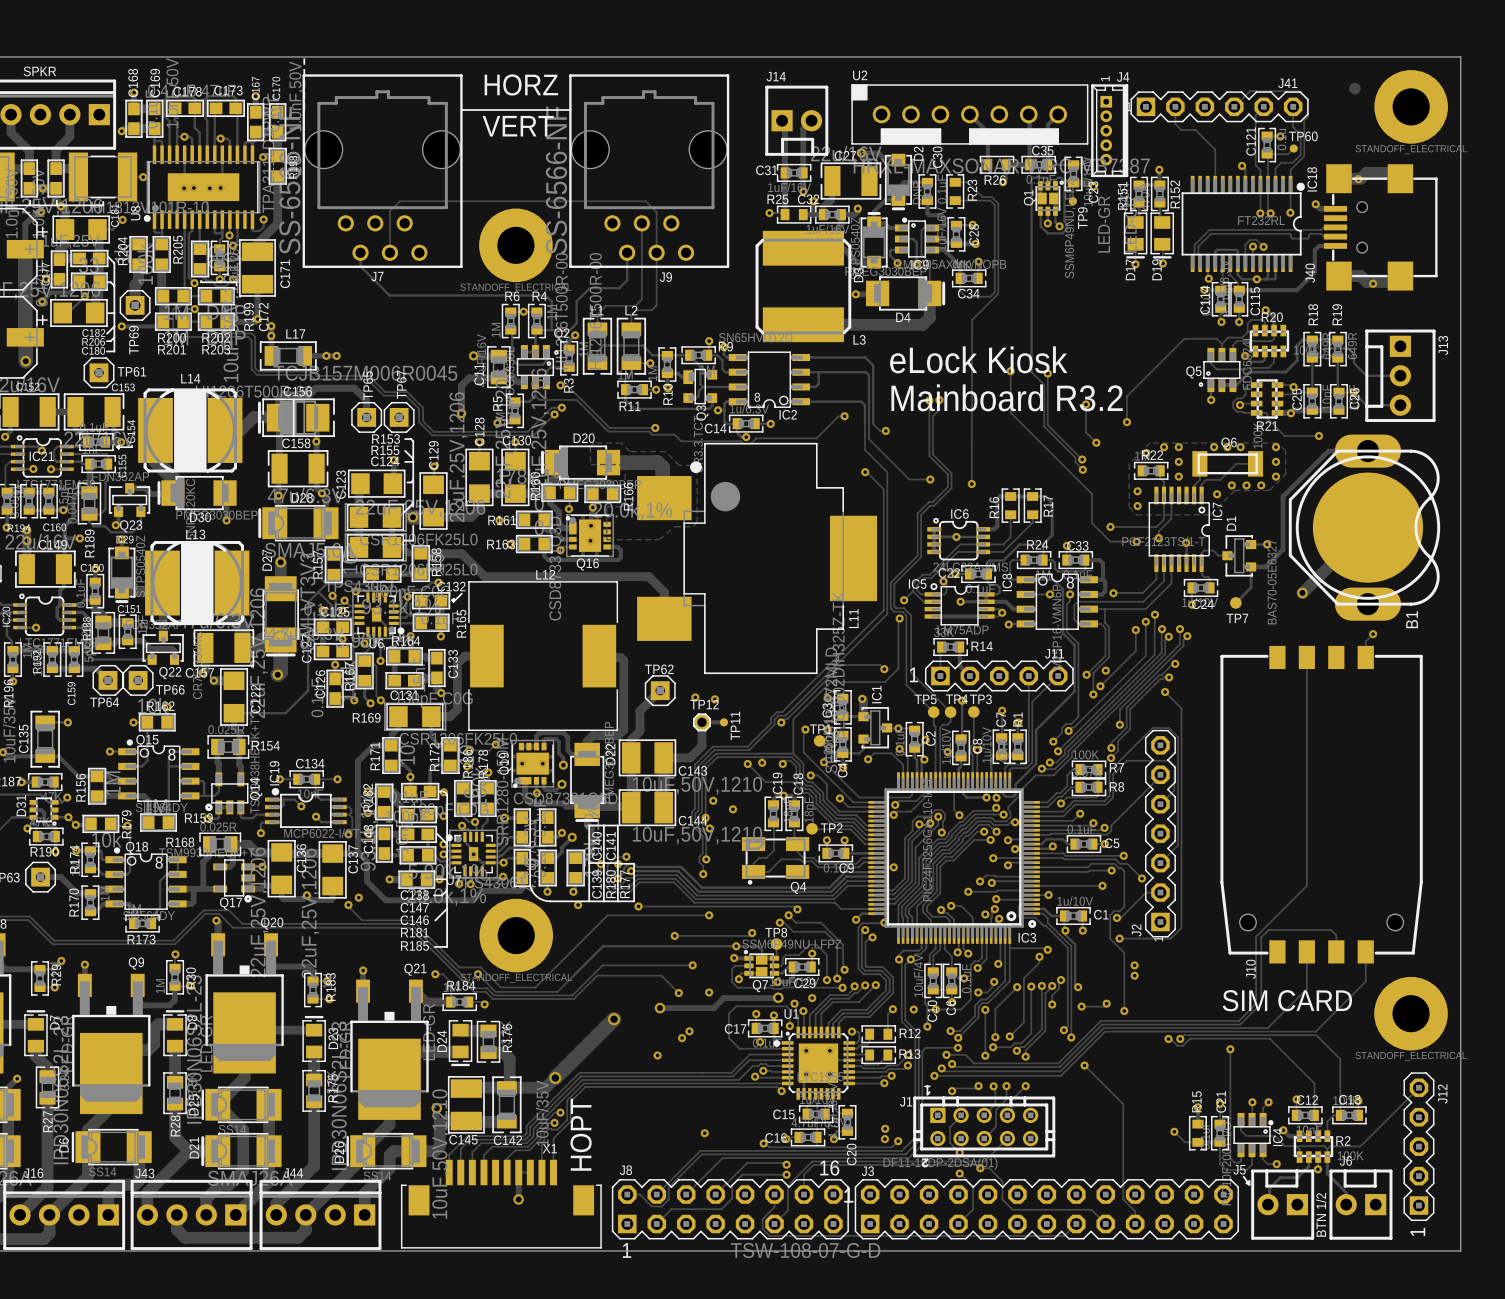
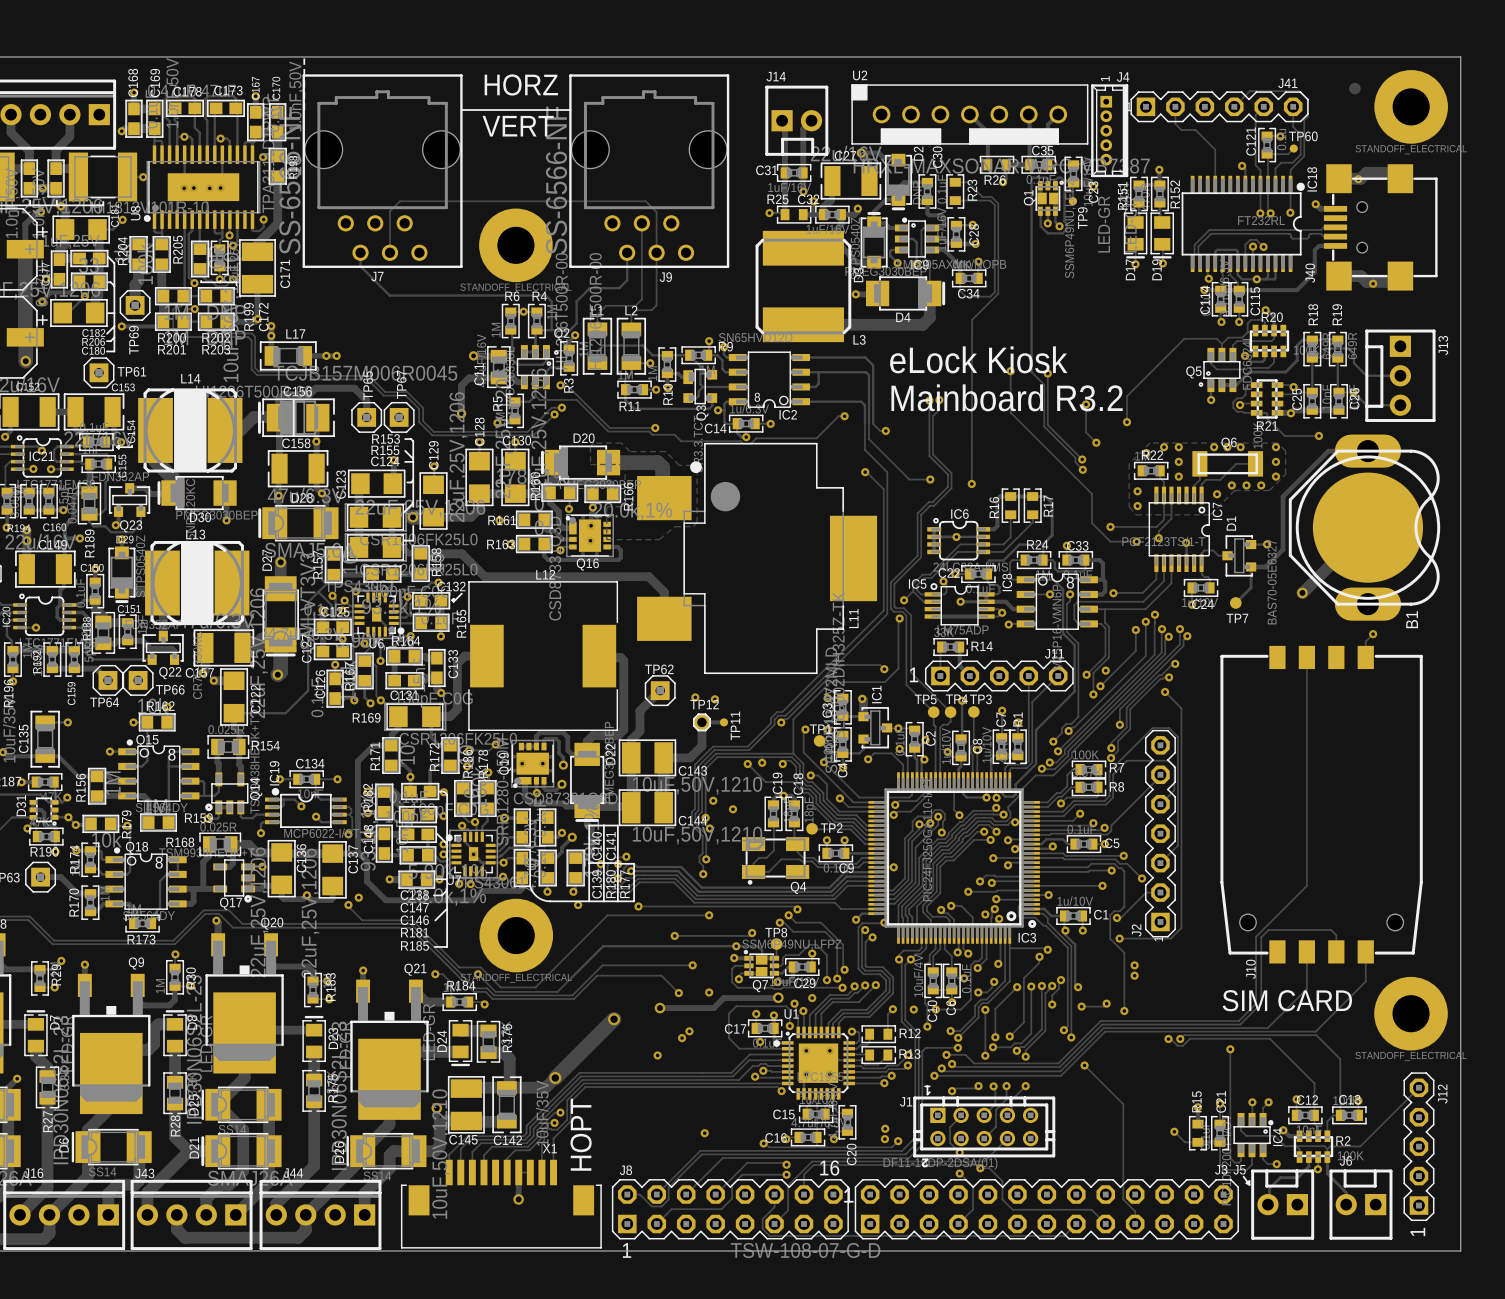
text: SPKR (39, 71) -> none
J3 name position: J3 (867, 1171) -> J3 (1221, 1169)
text: BTN 1/2 (1321, 1214) -> none

